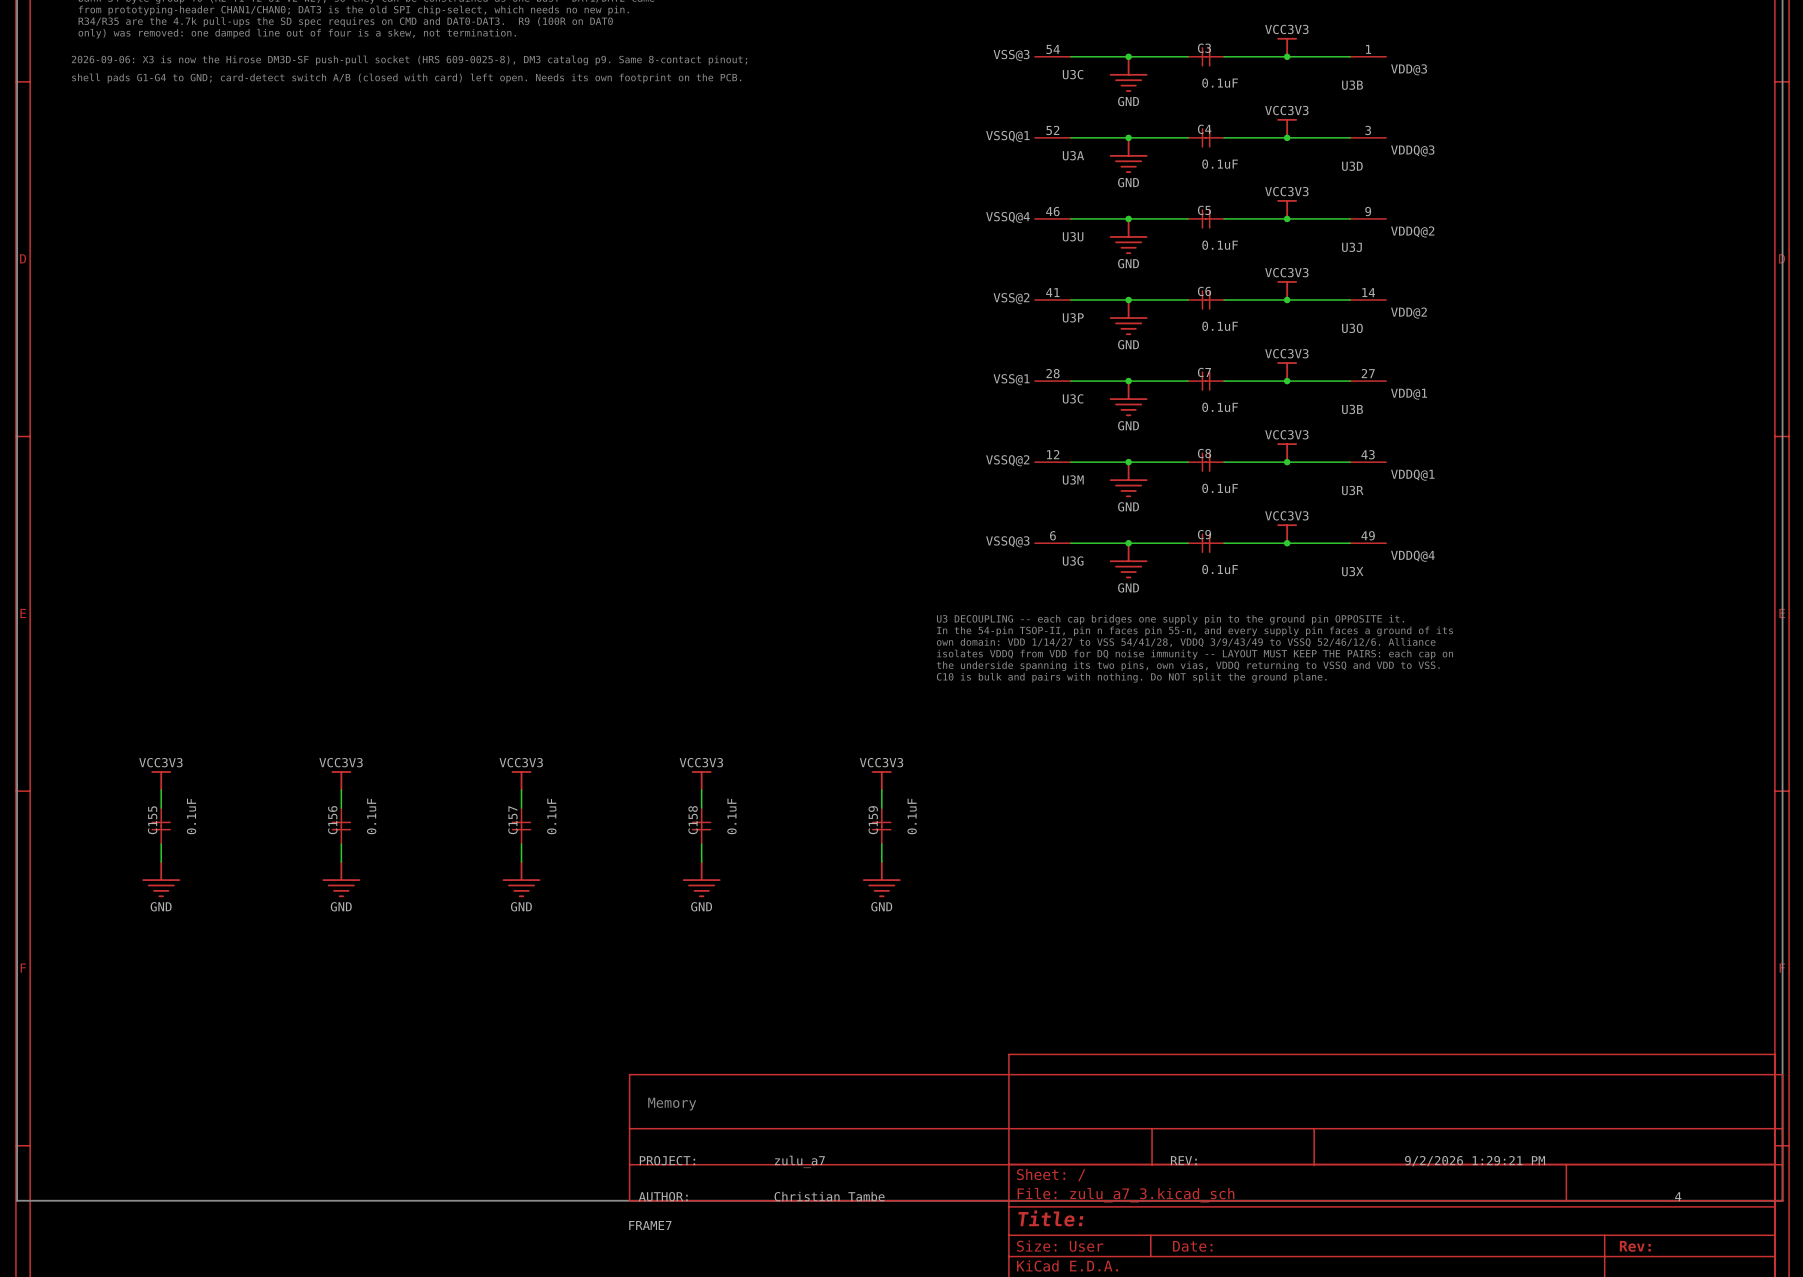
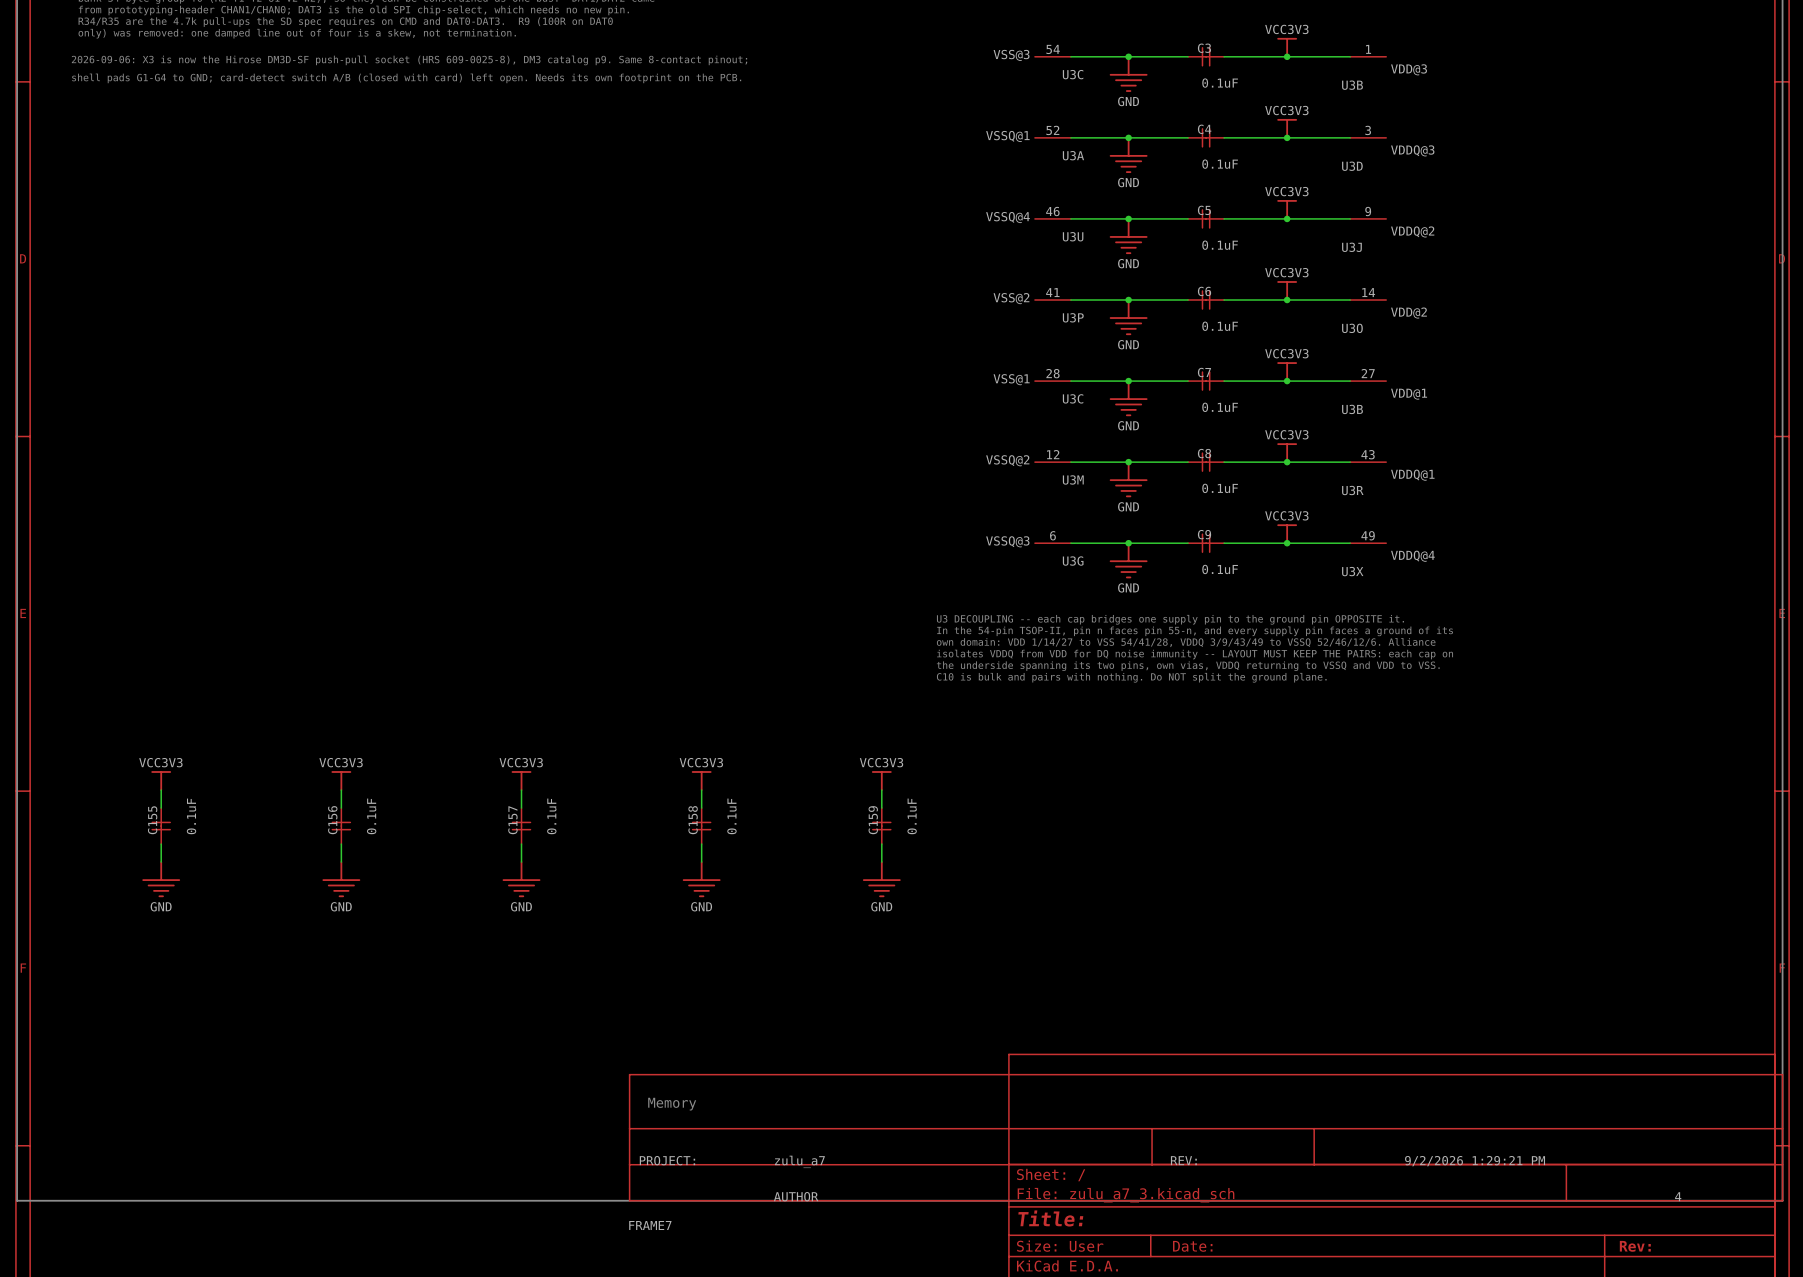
FRAME7 text: AUTHOR: (663, 1196) -> none
FRAME7 text: Christian Tambe (829, 1196) -> AUTHOR (796, 1196)

